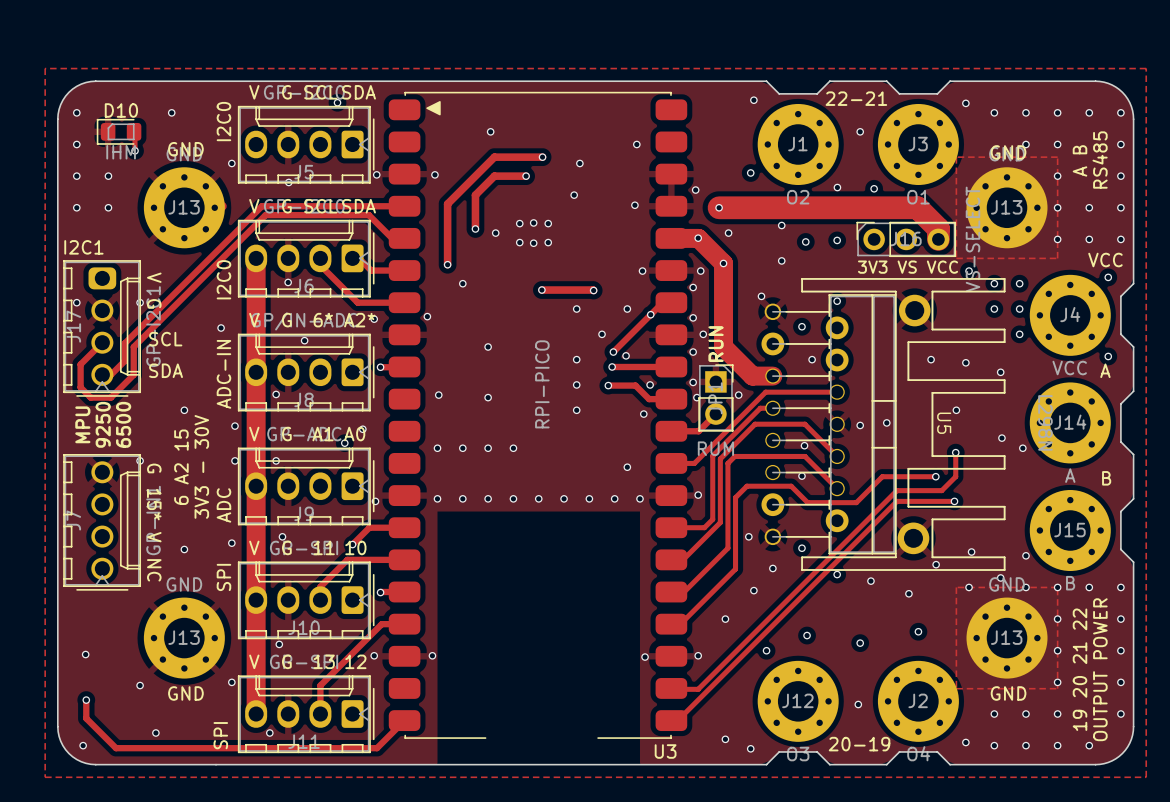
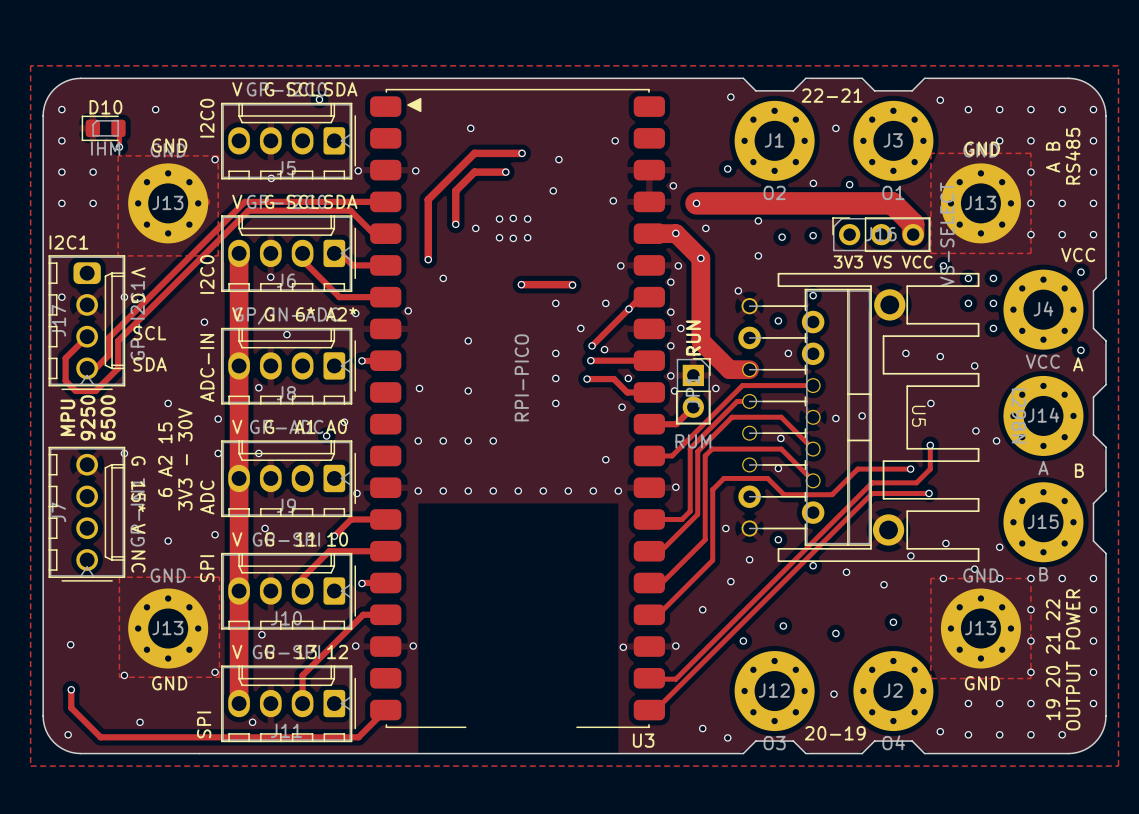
zone outline: none -> (118, 155) (118, 255) (218, 255) (218, 155) (118, 155)
zone outline: none -> (119, 577) (119, 677) (219, 677) (219, 577) (119, 577)

